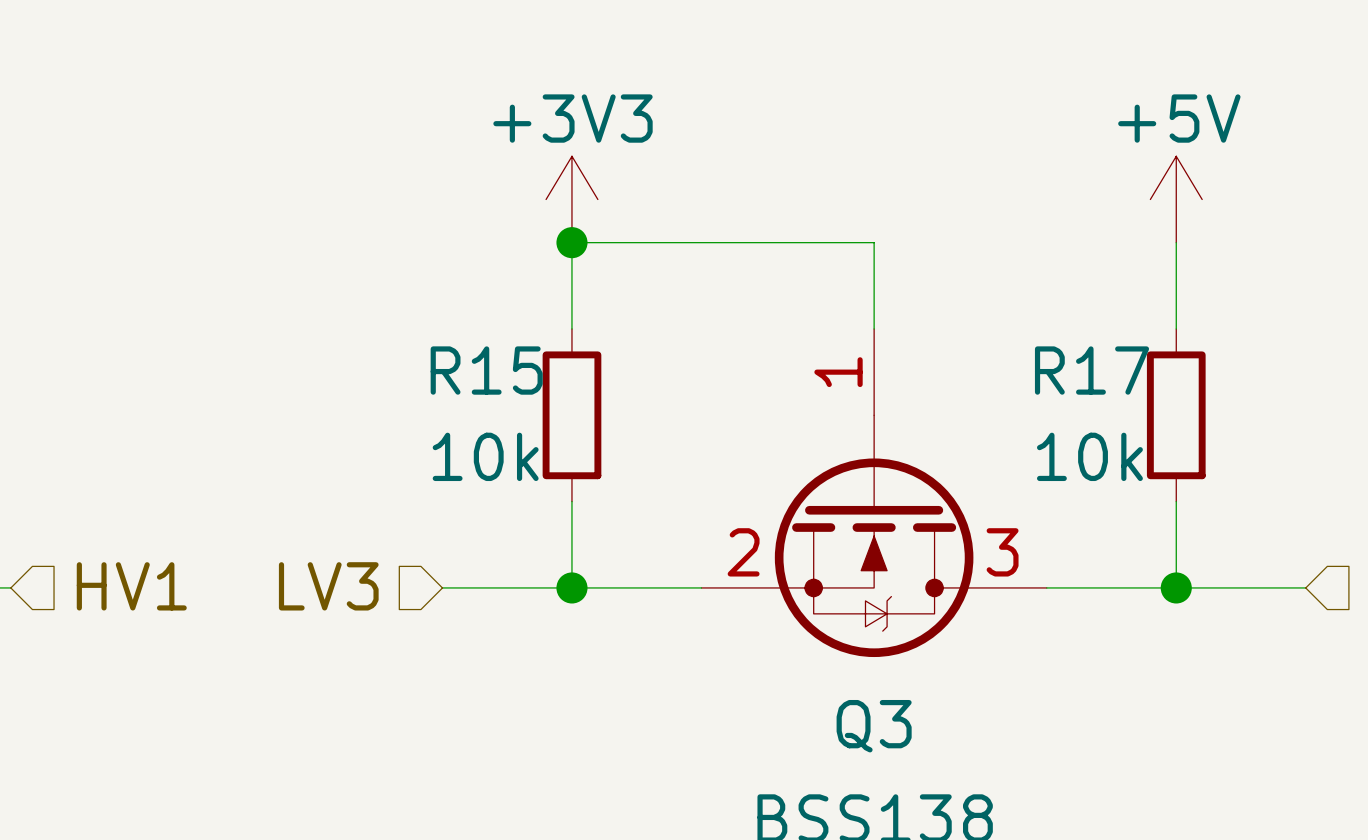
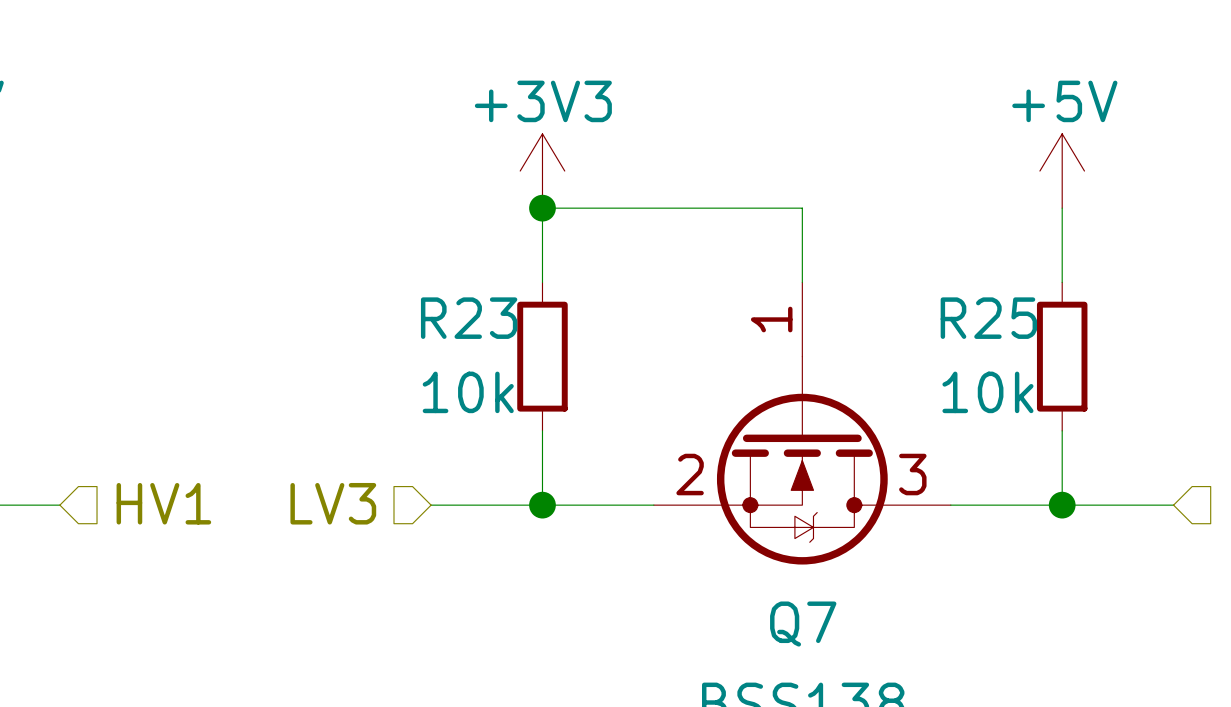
R15 name: R15 (486, 370) -> R23 (469, 318)
R17 name: R17 (1091, 370) -> R25 (988, 318)
Q3 name: Q3 (874, 726) -> Q7 (803, 624)

